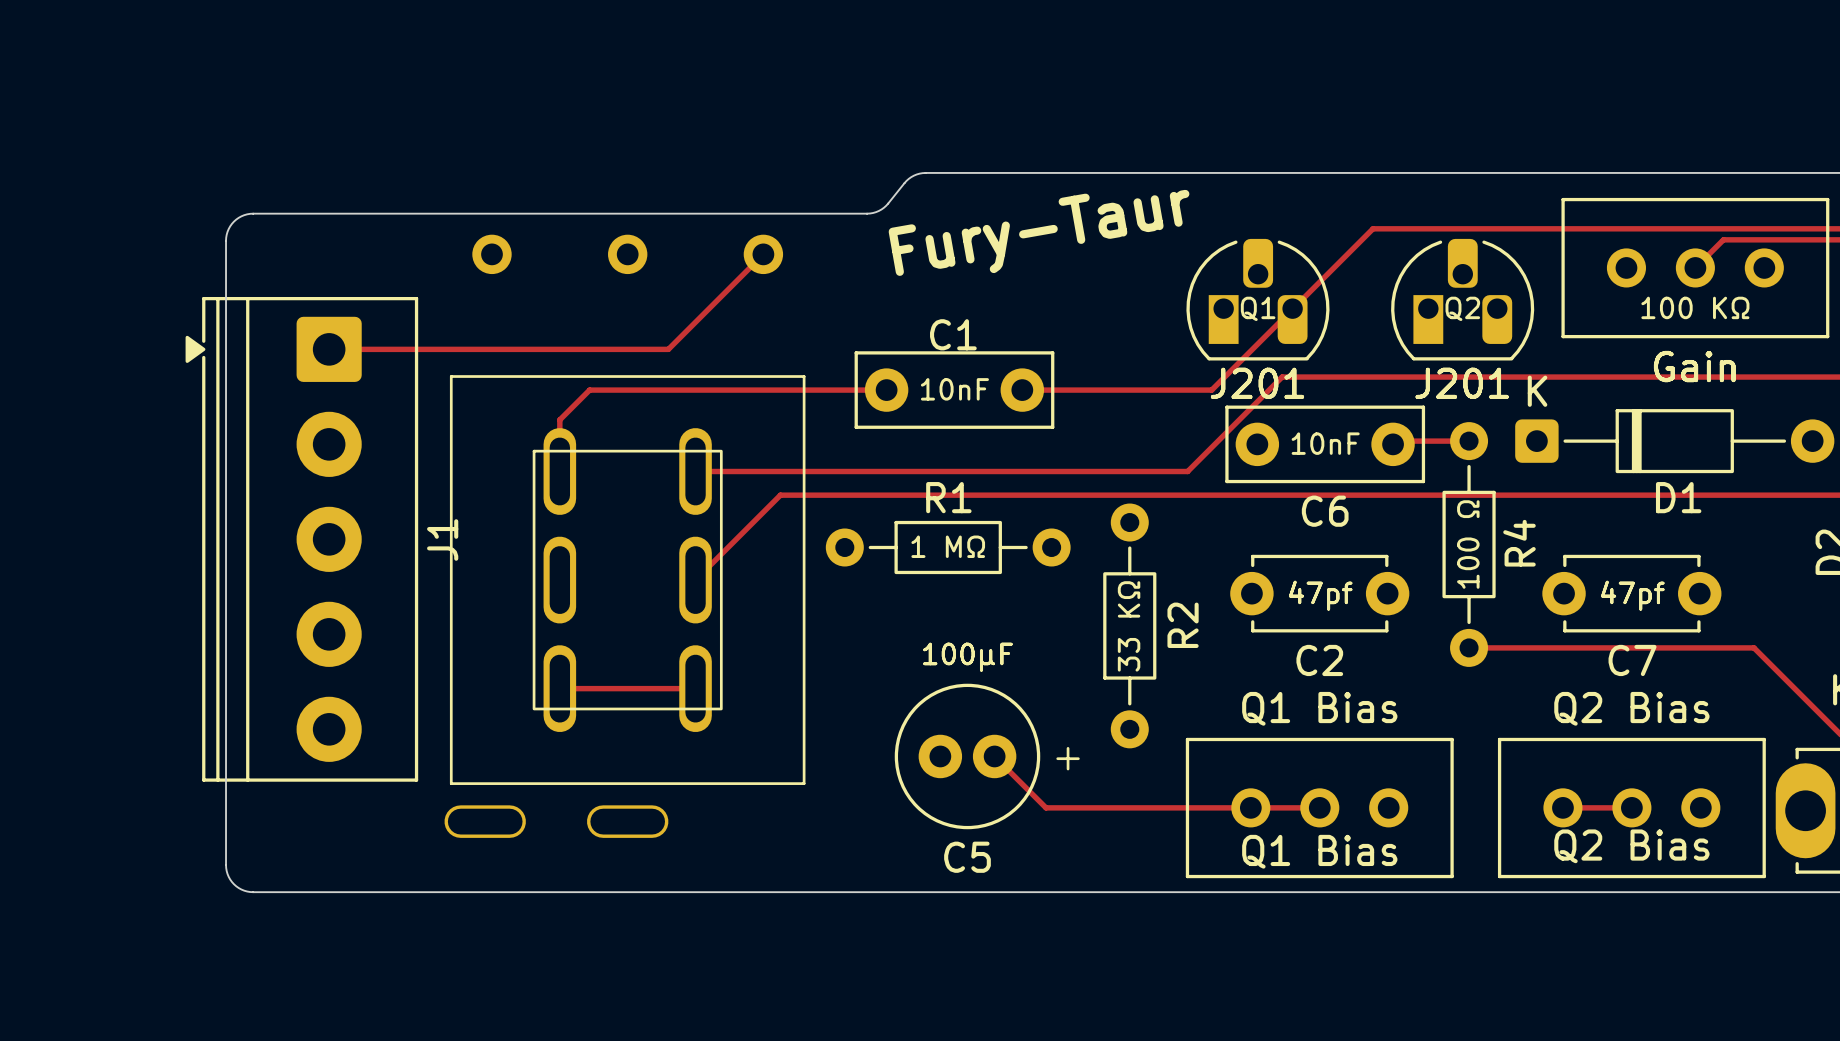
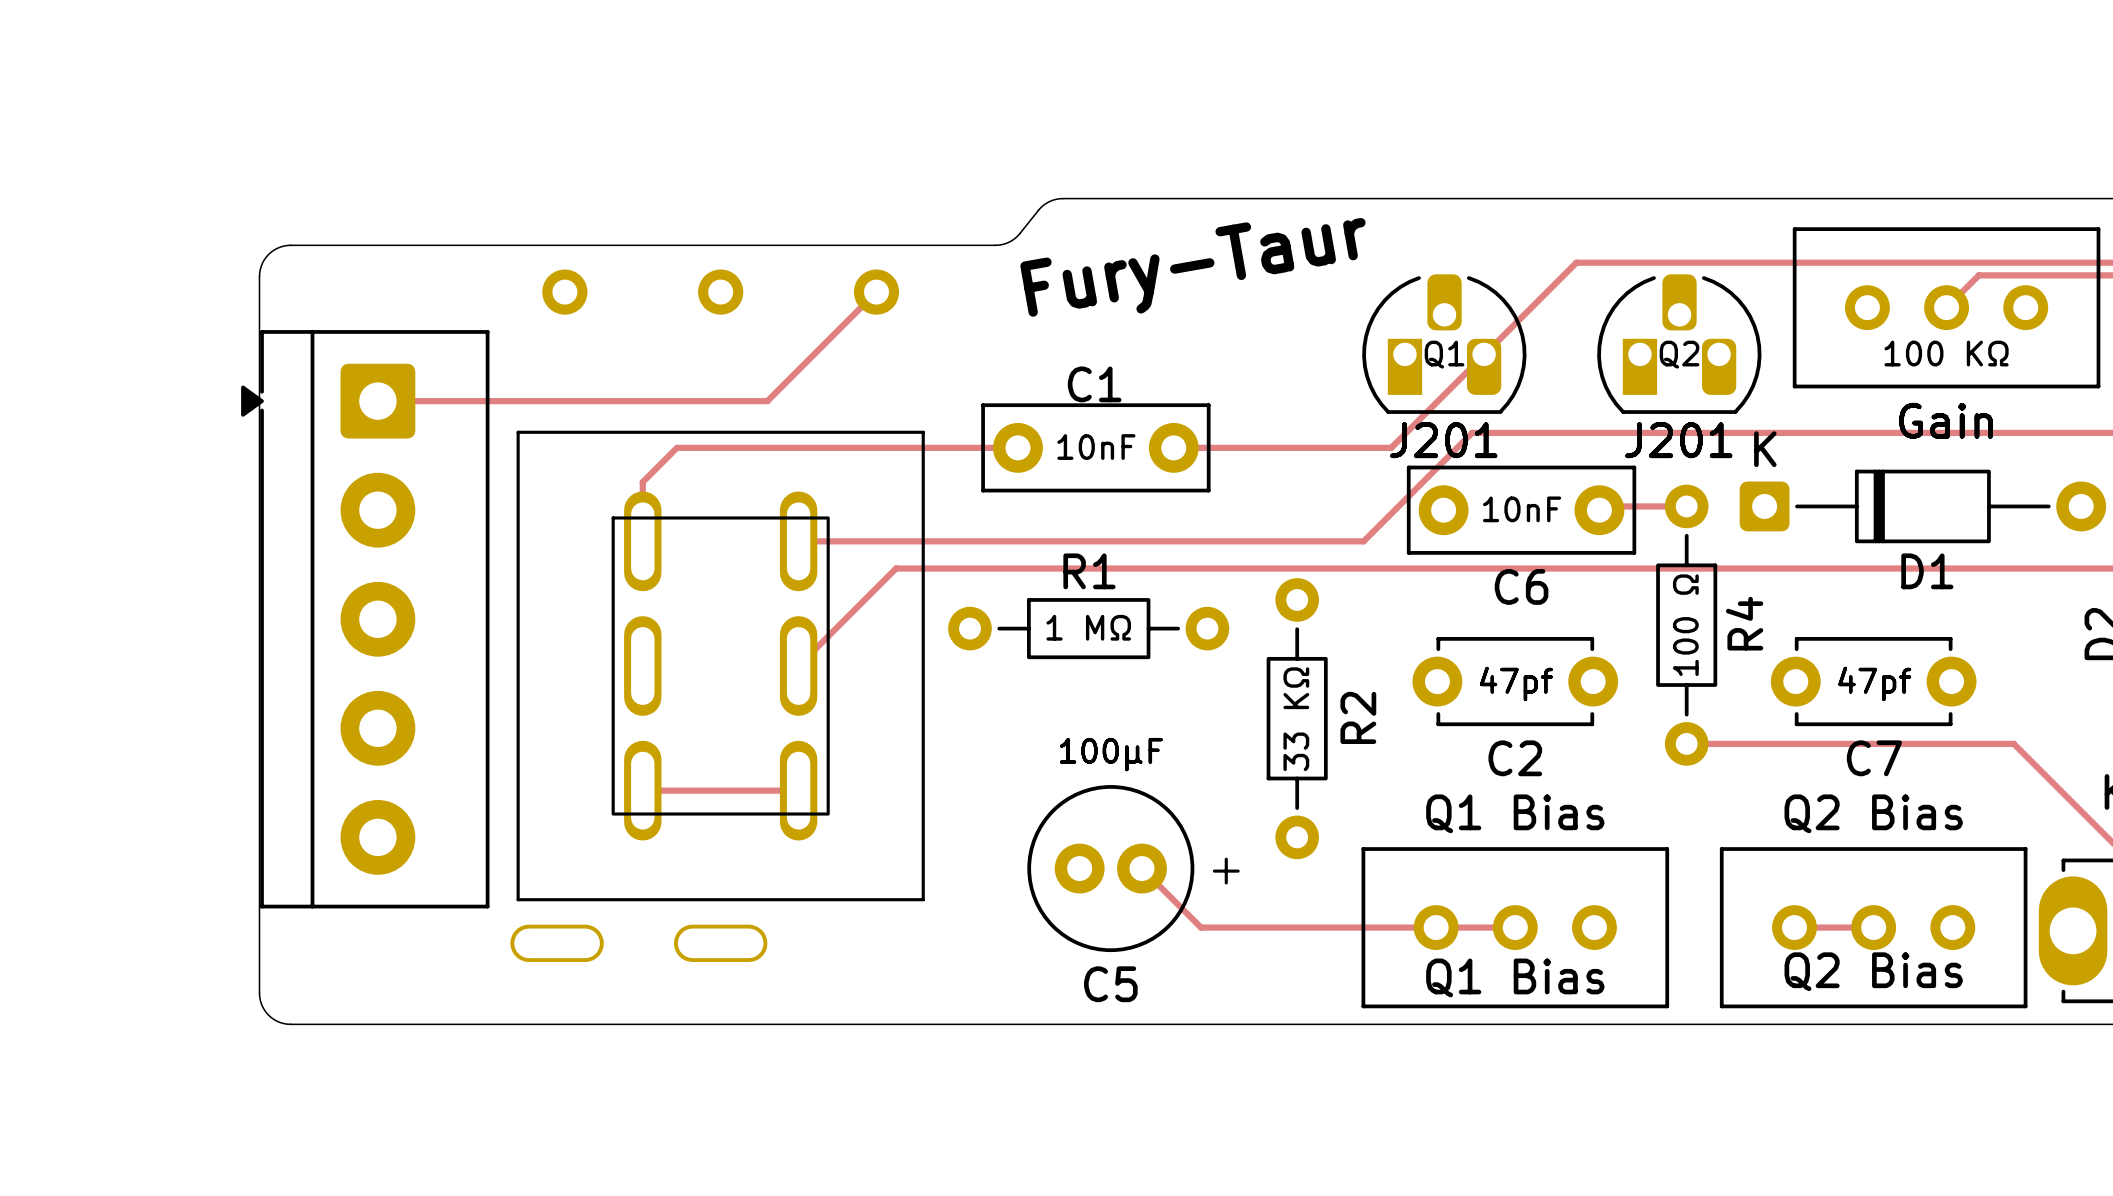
J1: (301, 539) -> none
part: none -> (365, 619)

